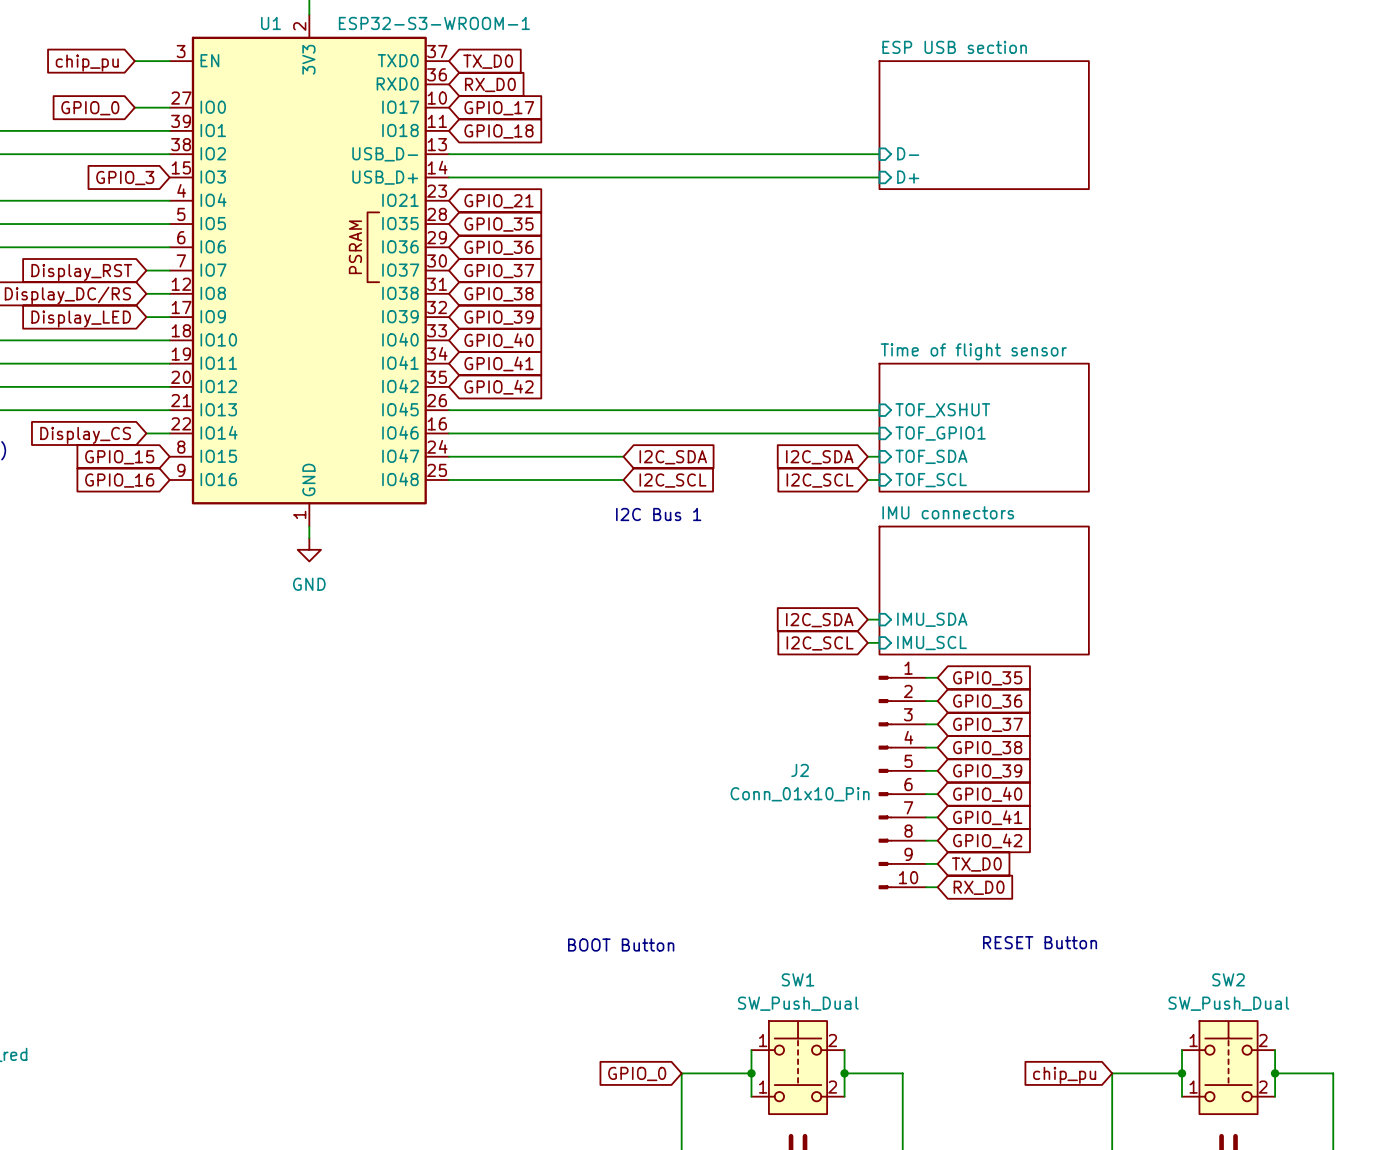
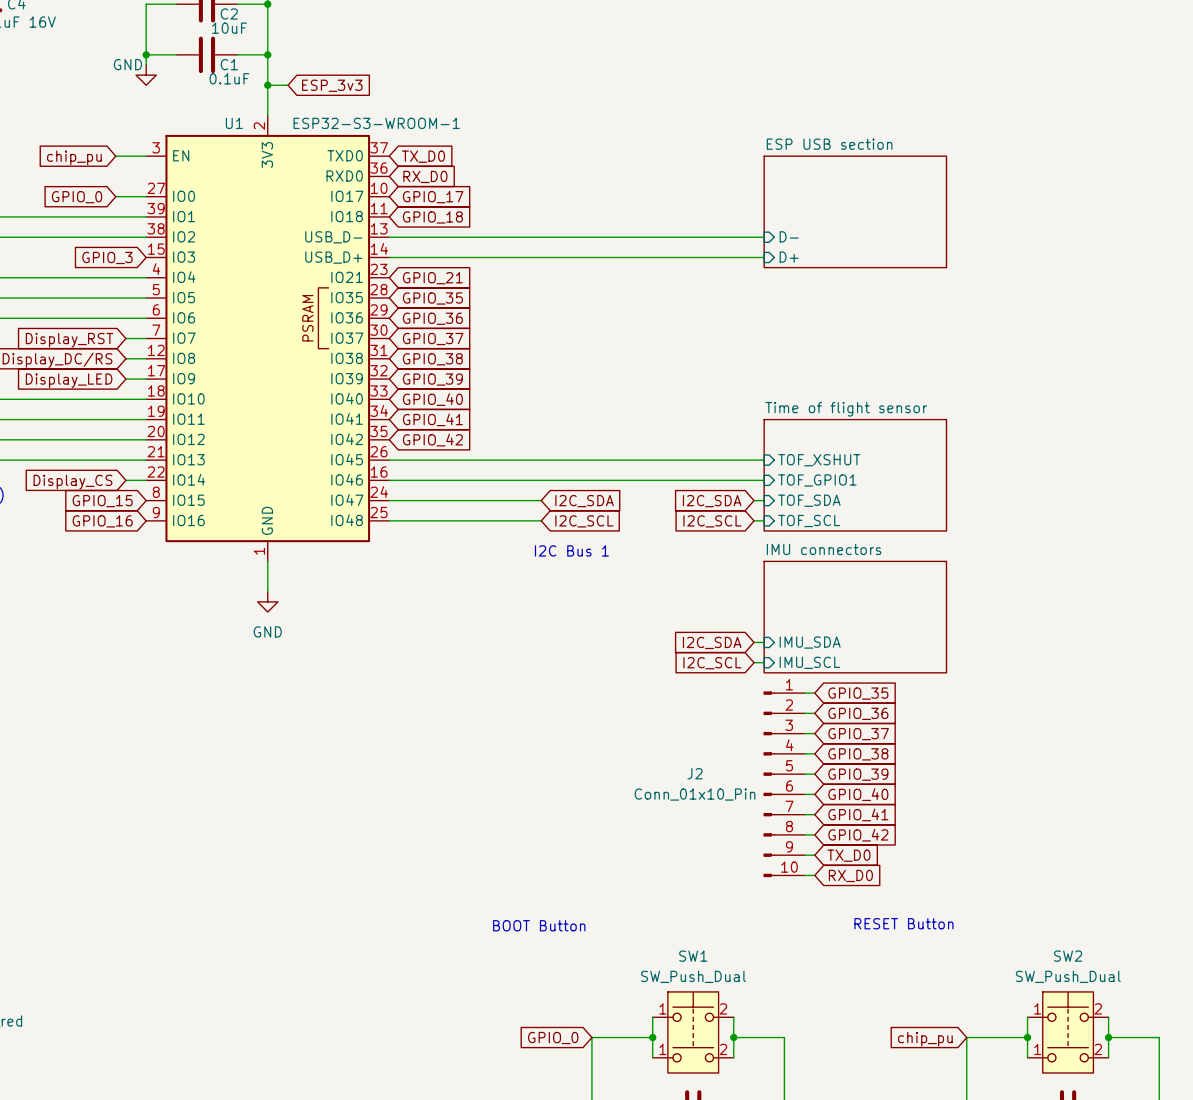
power symbol position: GND (309, 549) -> GND (267, 601)

